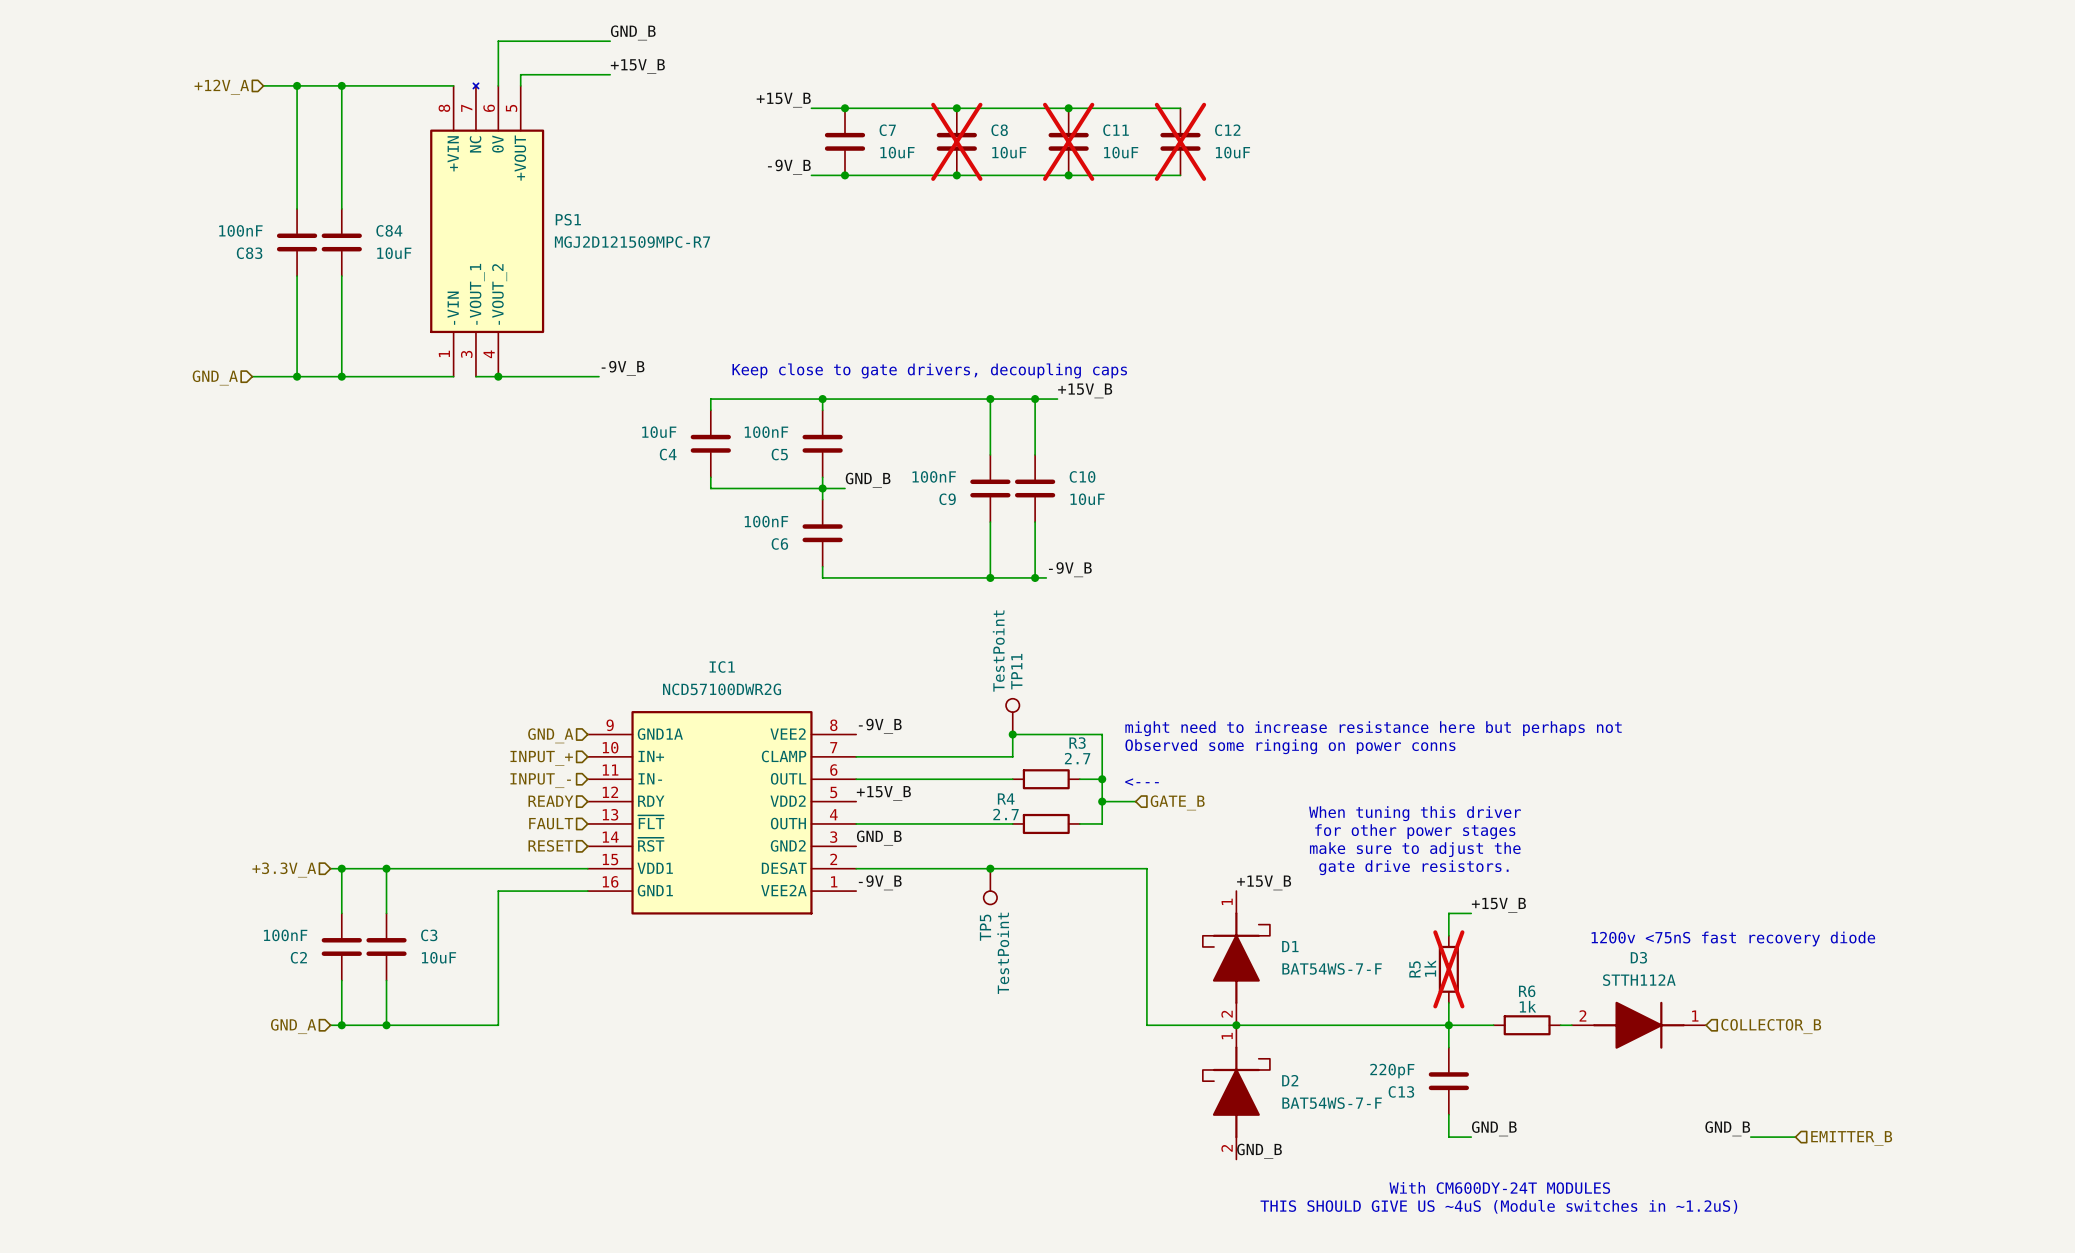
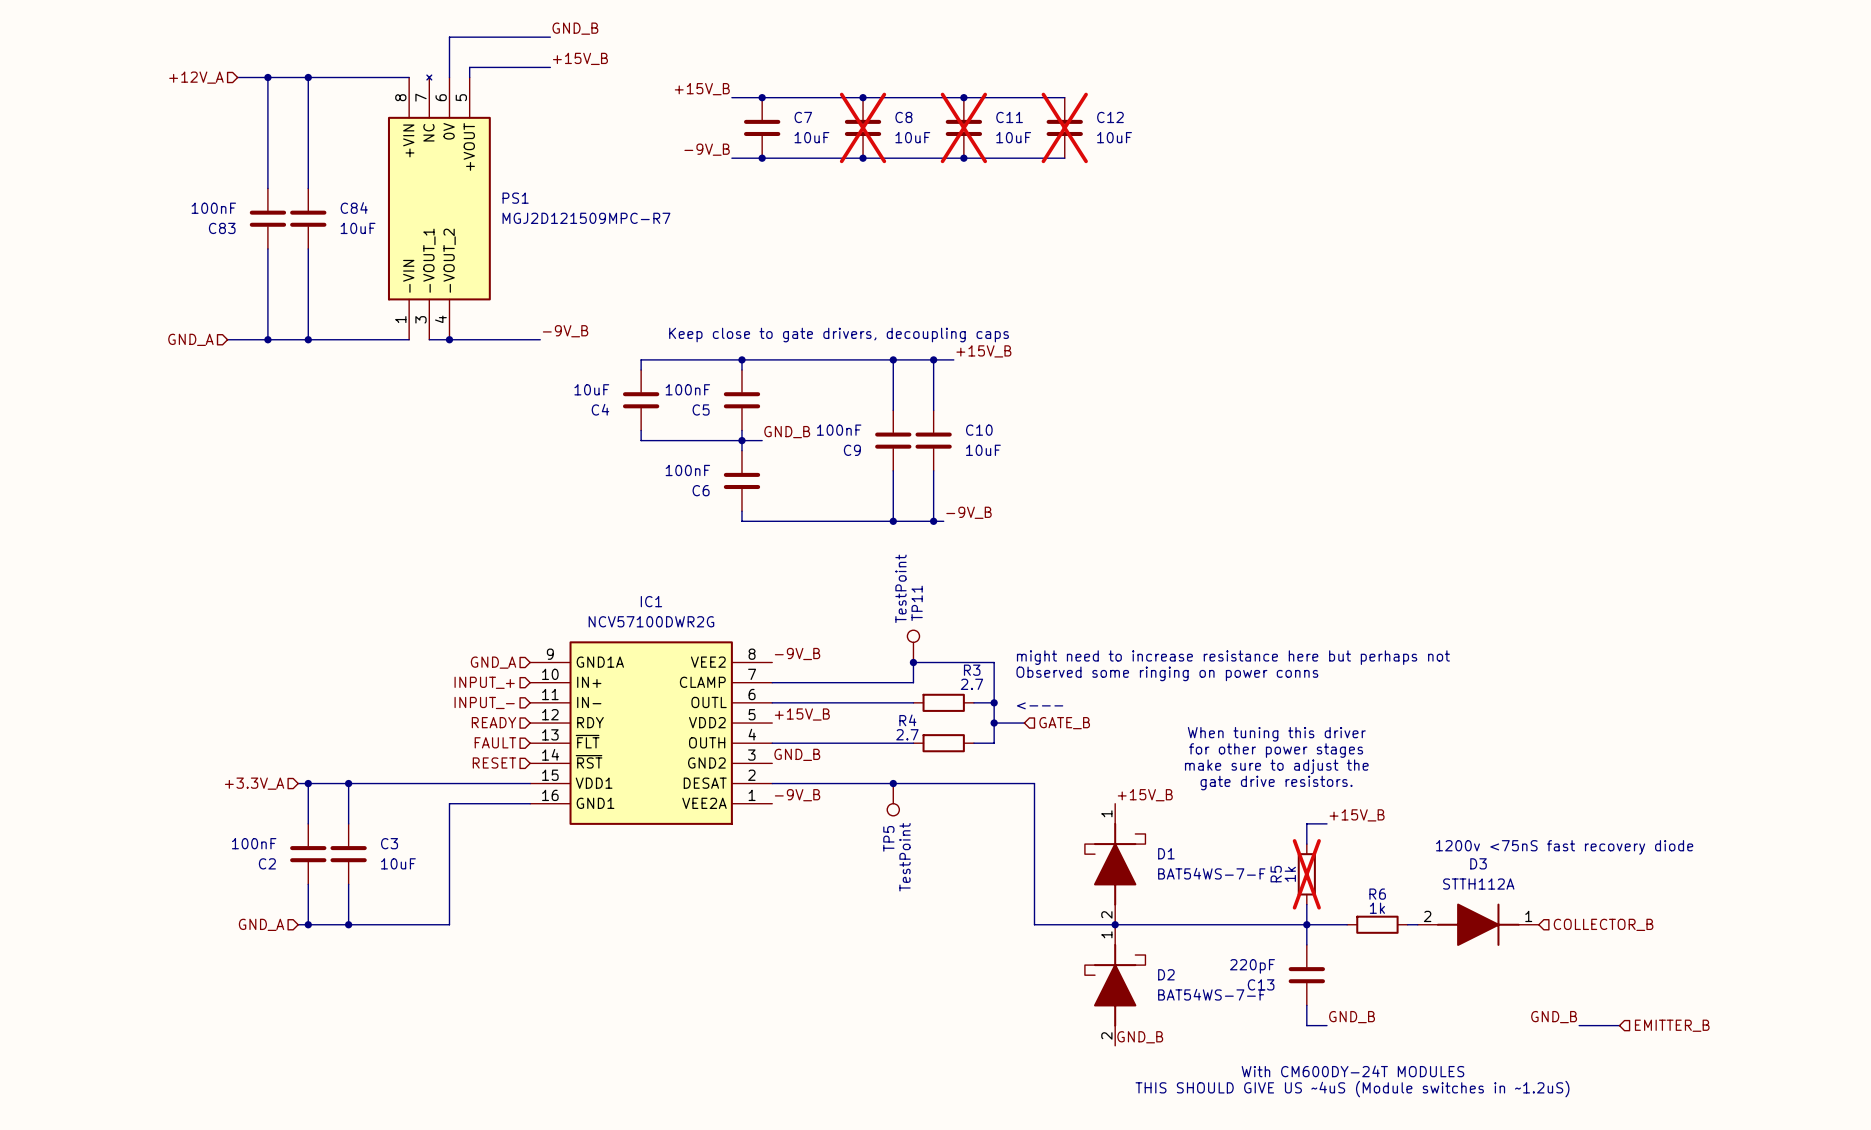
IC1 value: NCD57100DWR2G (722, 689) -> NCV57100DWR2G (651, 621)

